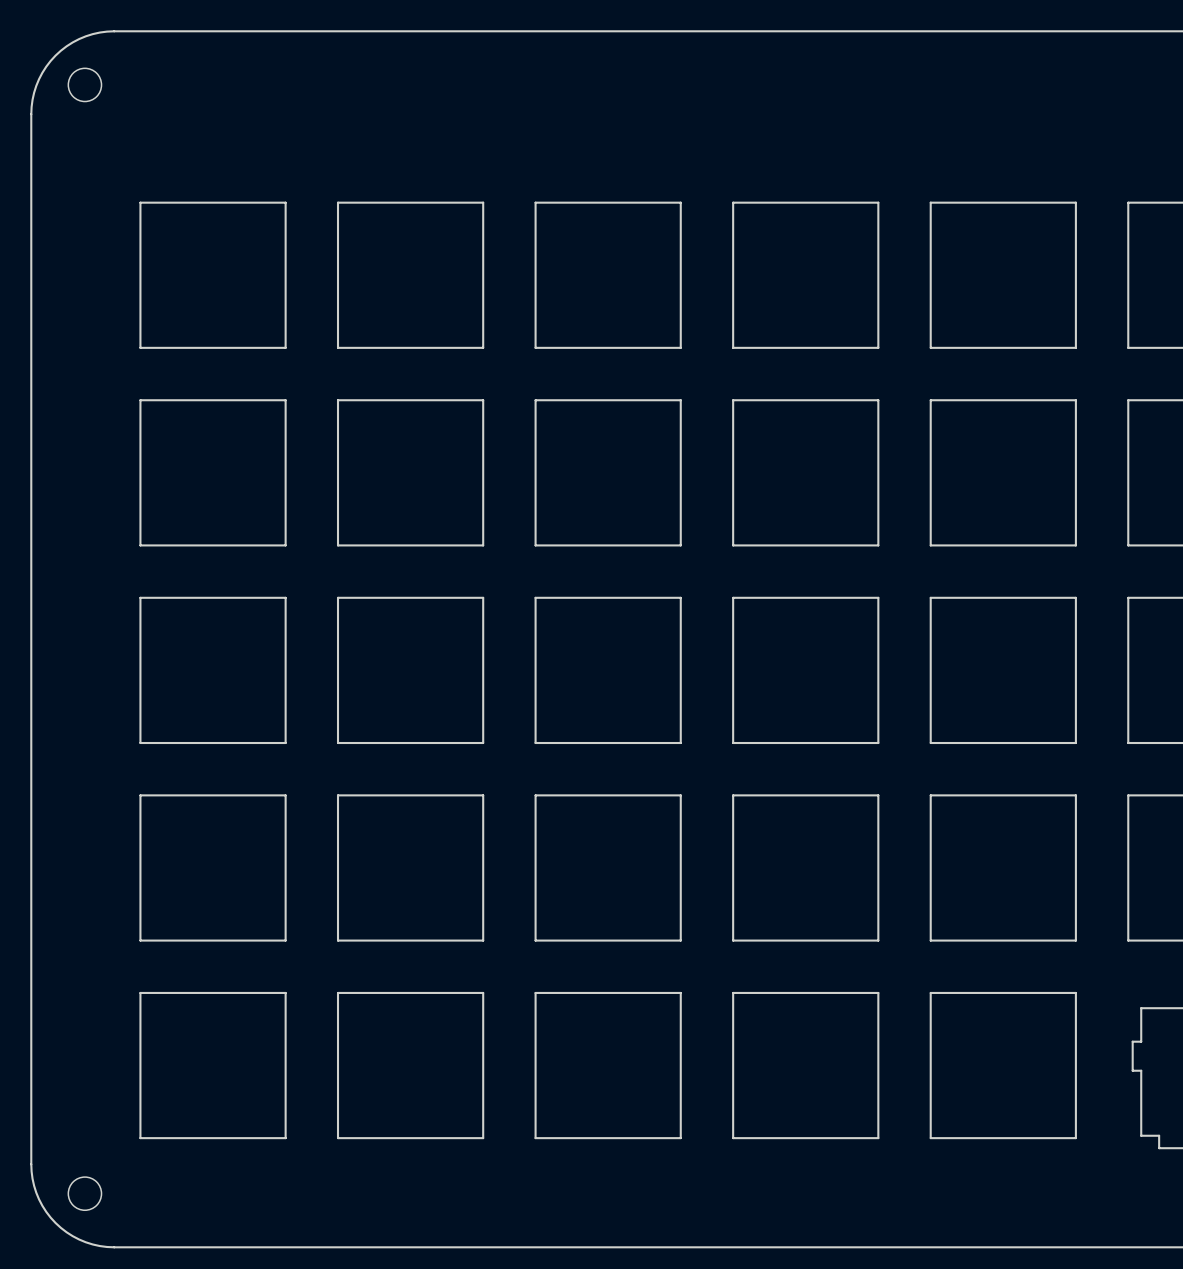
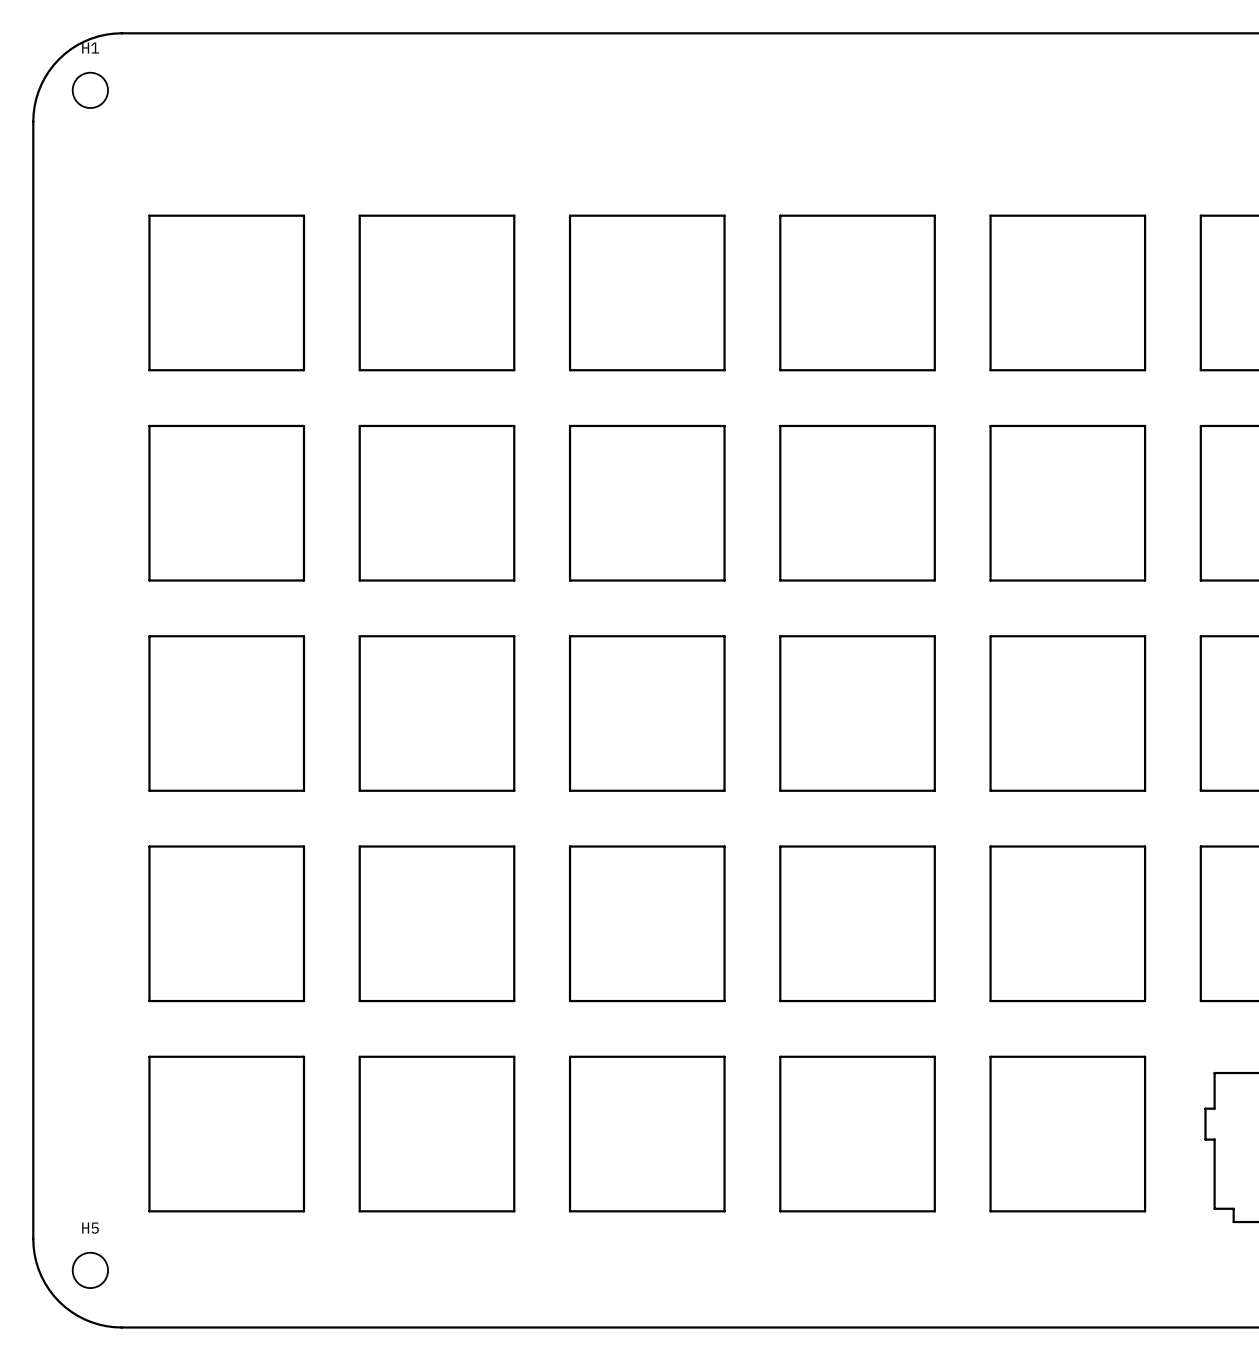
H1 name: none -> H1 (90, 48)
H5 name: none -> H5 (90, 1228)

